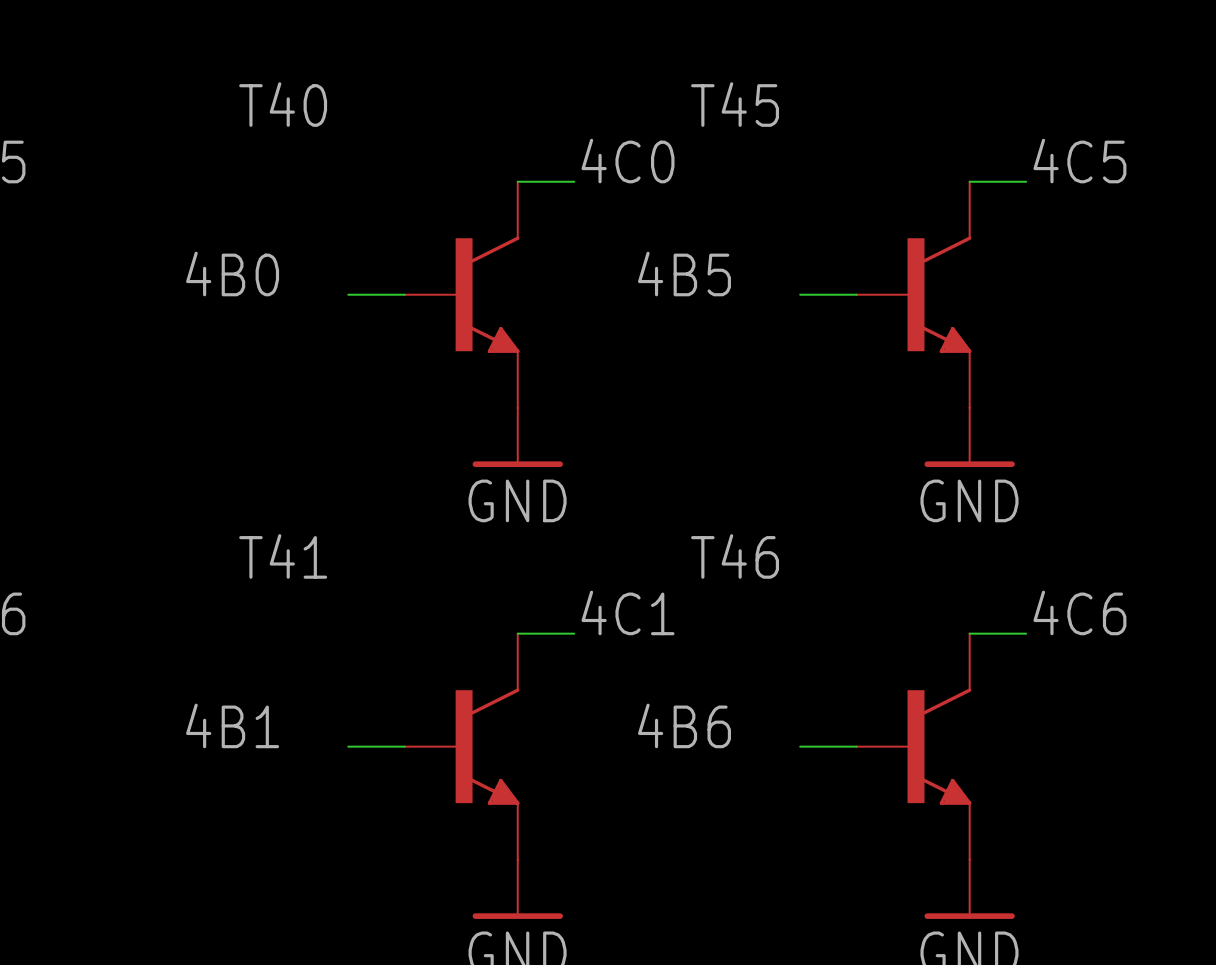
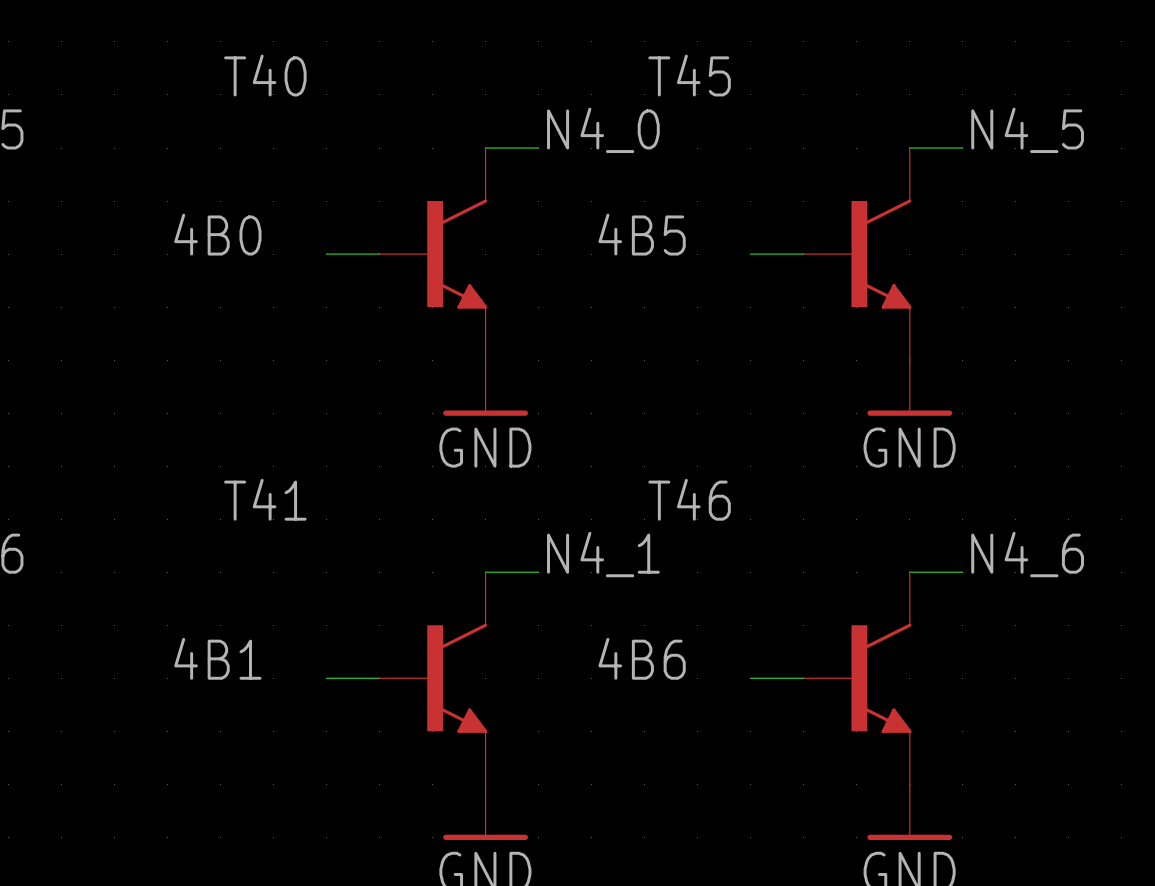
label: 4C0 (628, 161) -> N4_0 (603, 130)
label: 4C5 (1079, 161) -> N4_5 (1027, 130)
label: 4C1 (628, 612) -> N4_1 (603, 554)
label: 4C6 (1079, 612) -> N4_6 (1027, 554)

